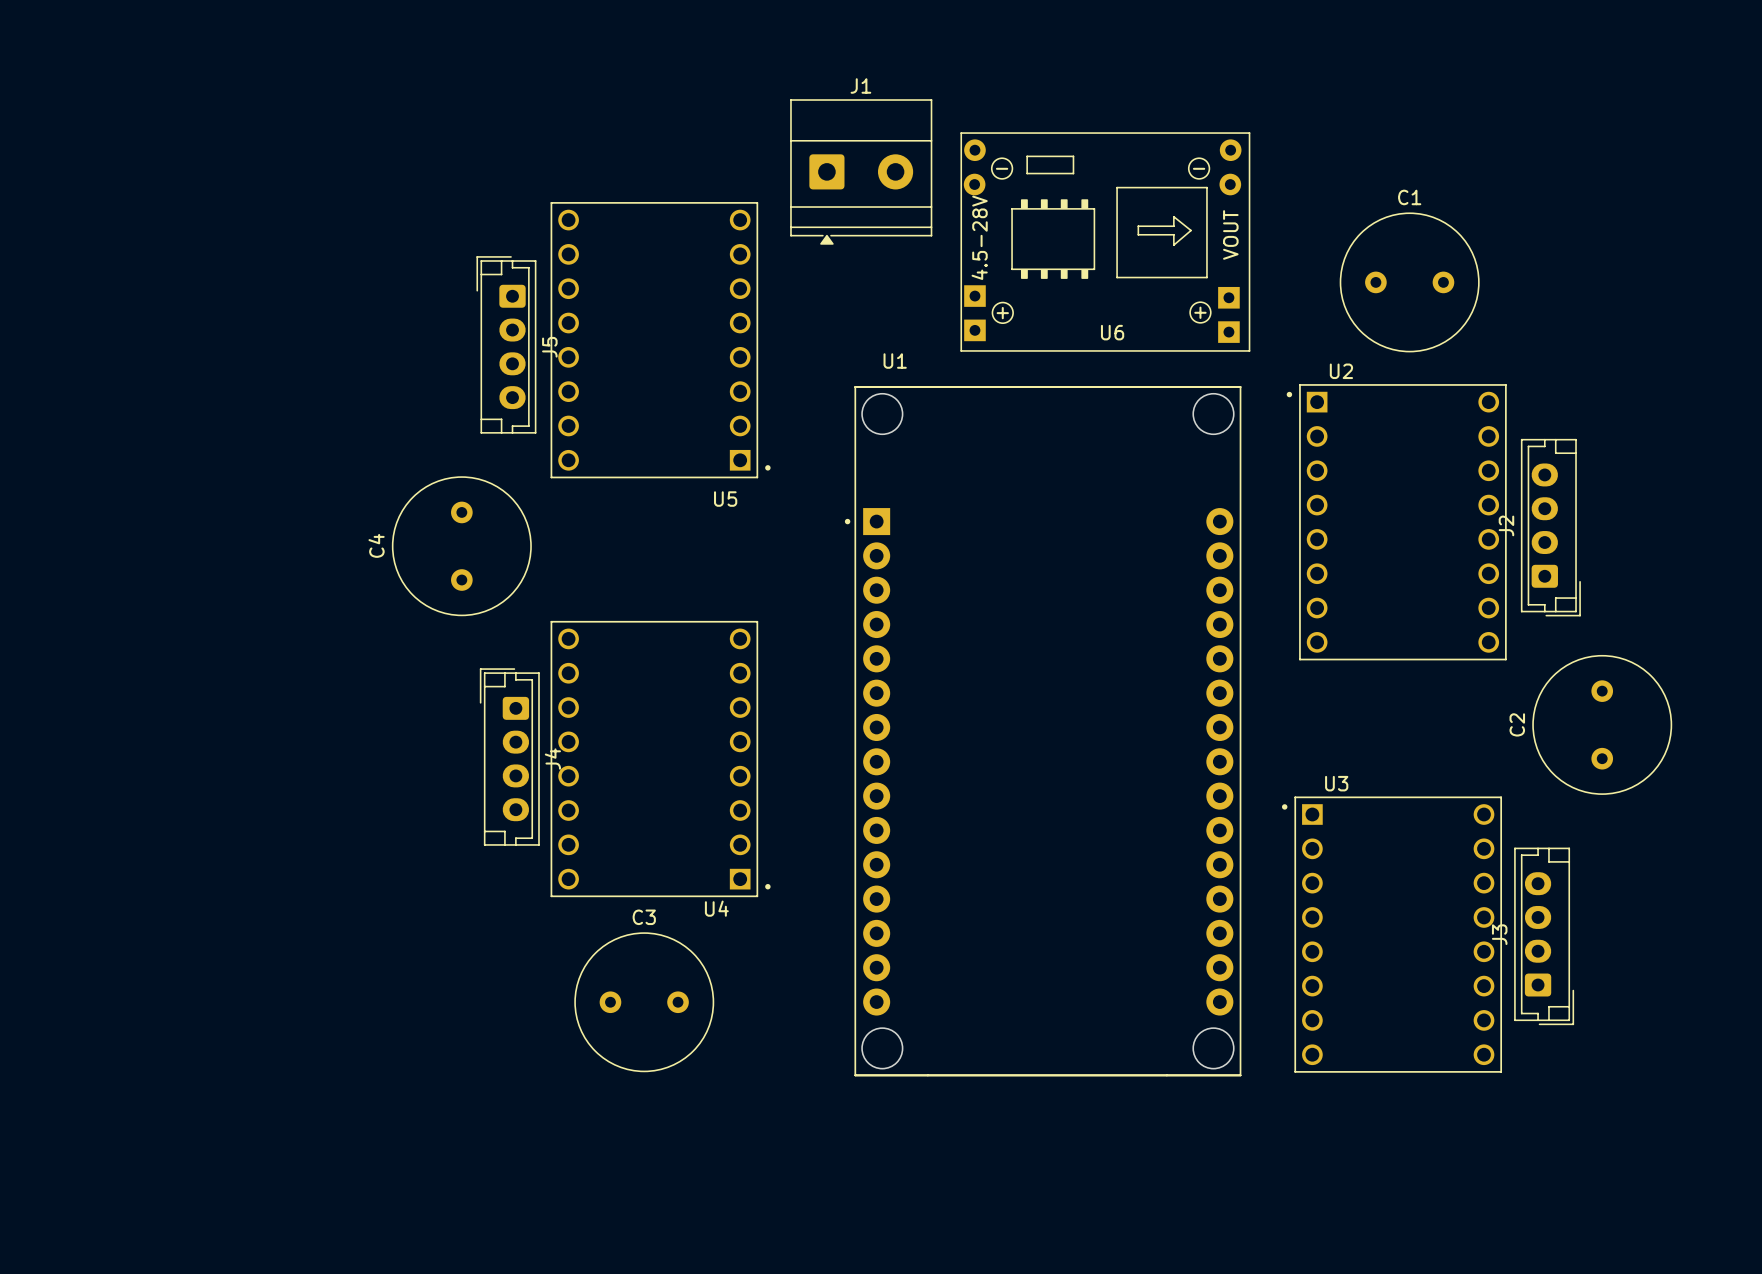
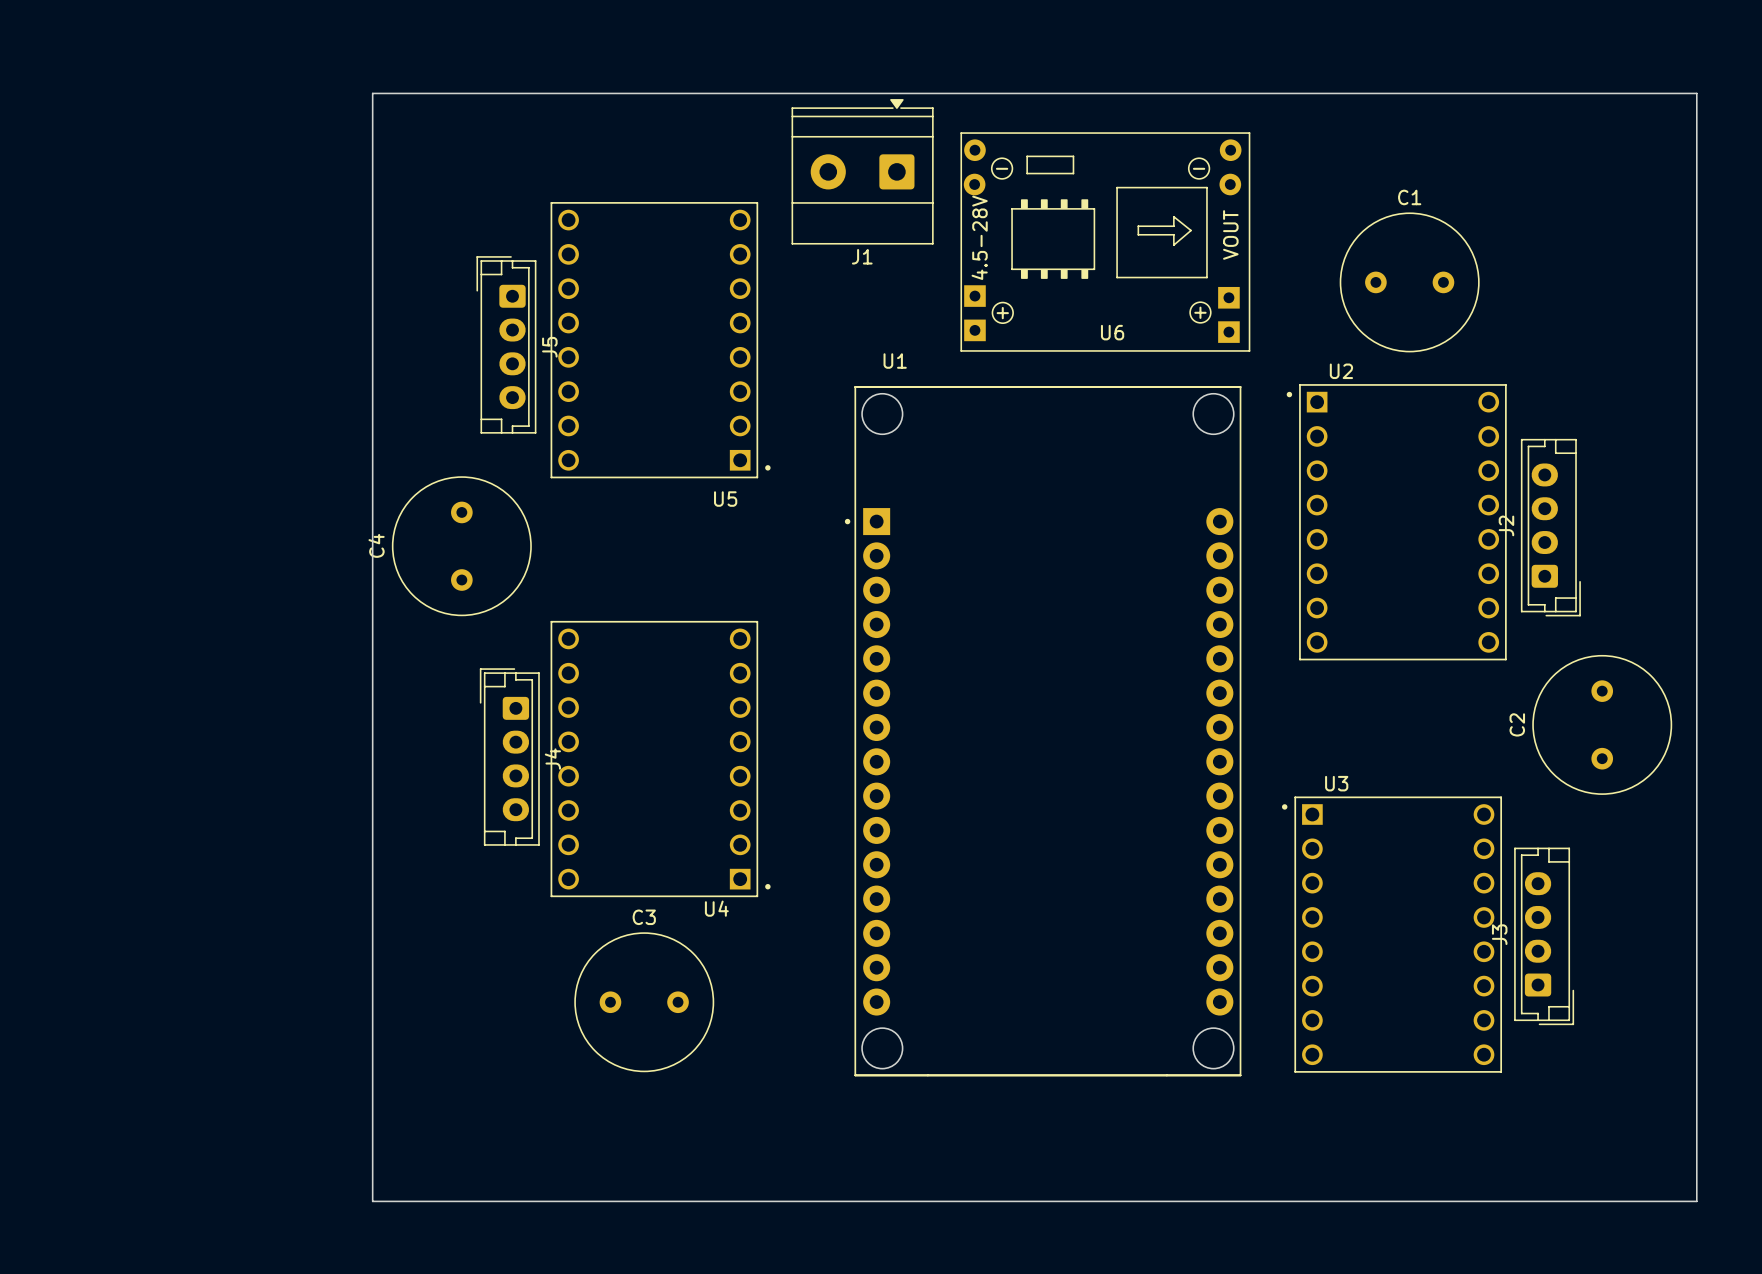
board edge: none -> (372, 93) (1696, 93) (1696, 1201) (372, 1201) (372, 93)
J1 rotation: 0° (861, 171) -> 180° (862, 171)

